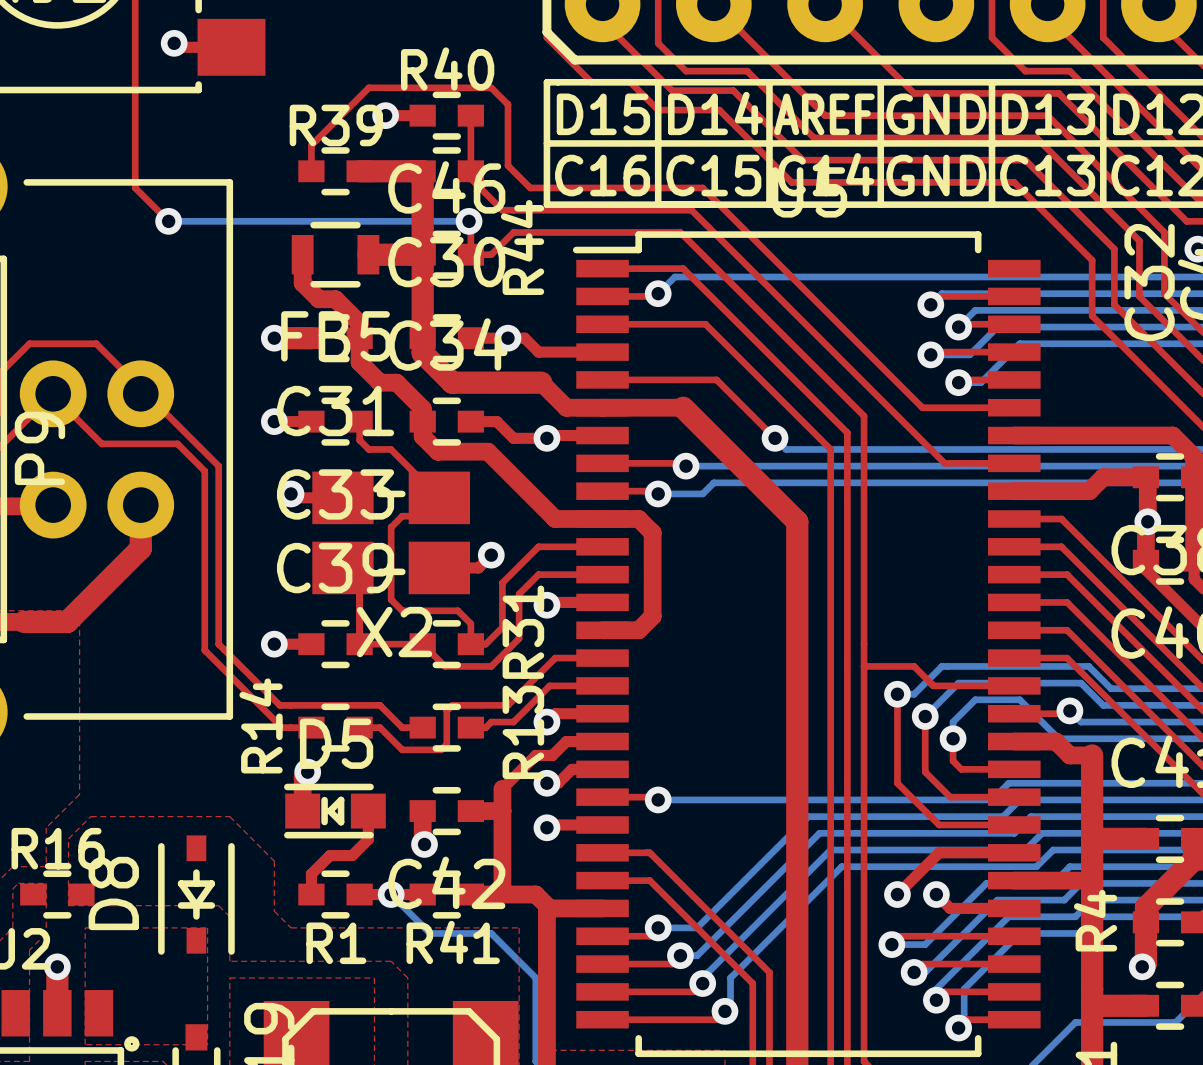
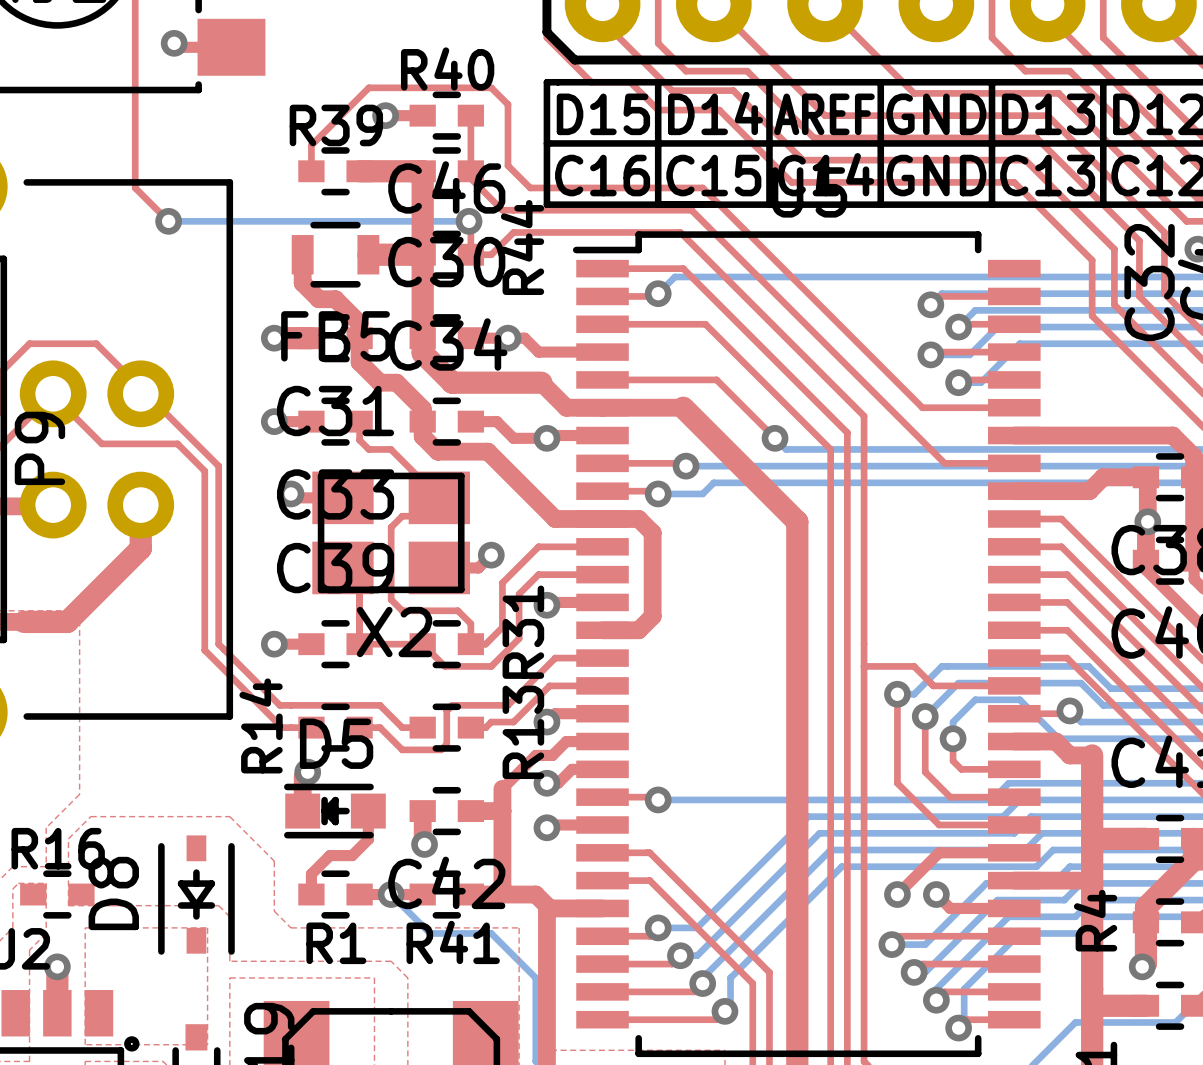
X2 footprint: [312, 471, 471, 595] -> [312, 471, 471, 595]
D5 footprint: [284, 783, 386, 839] -> [284, 783, 386, 839]

